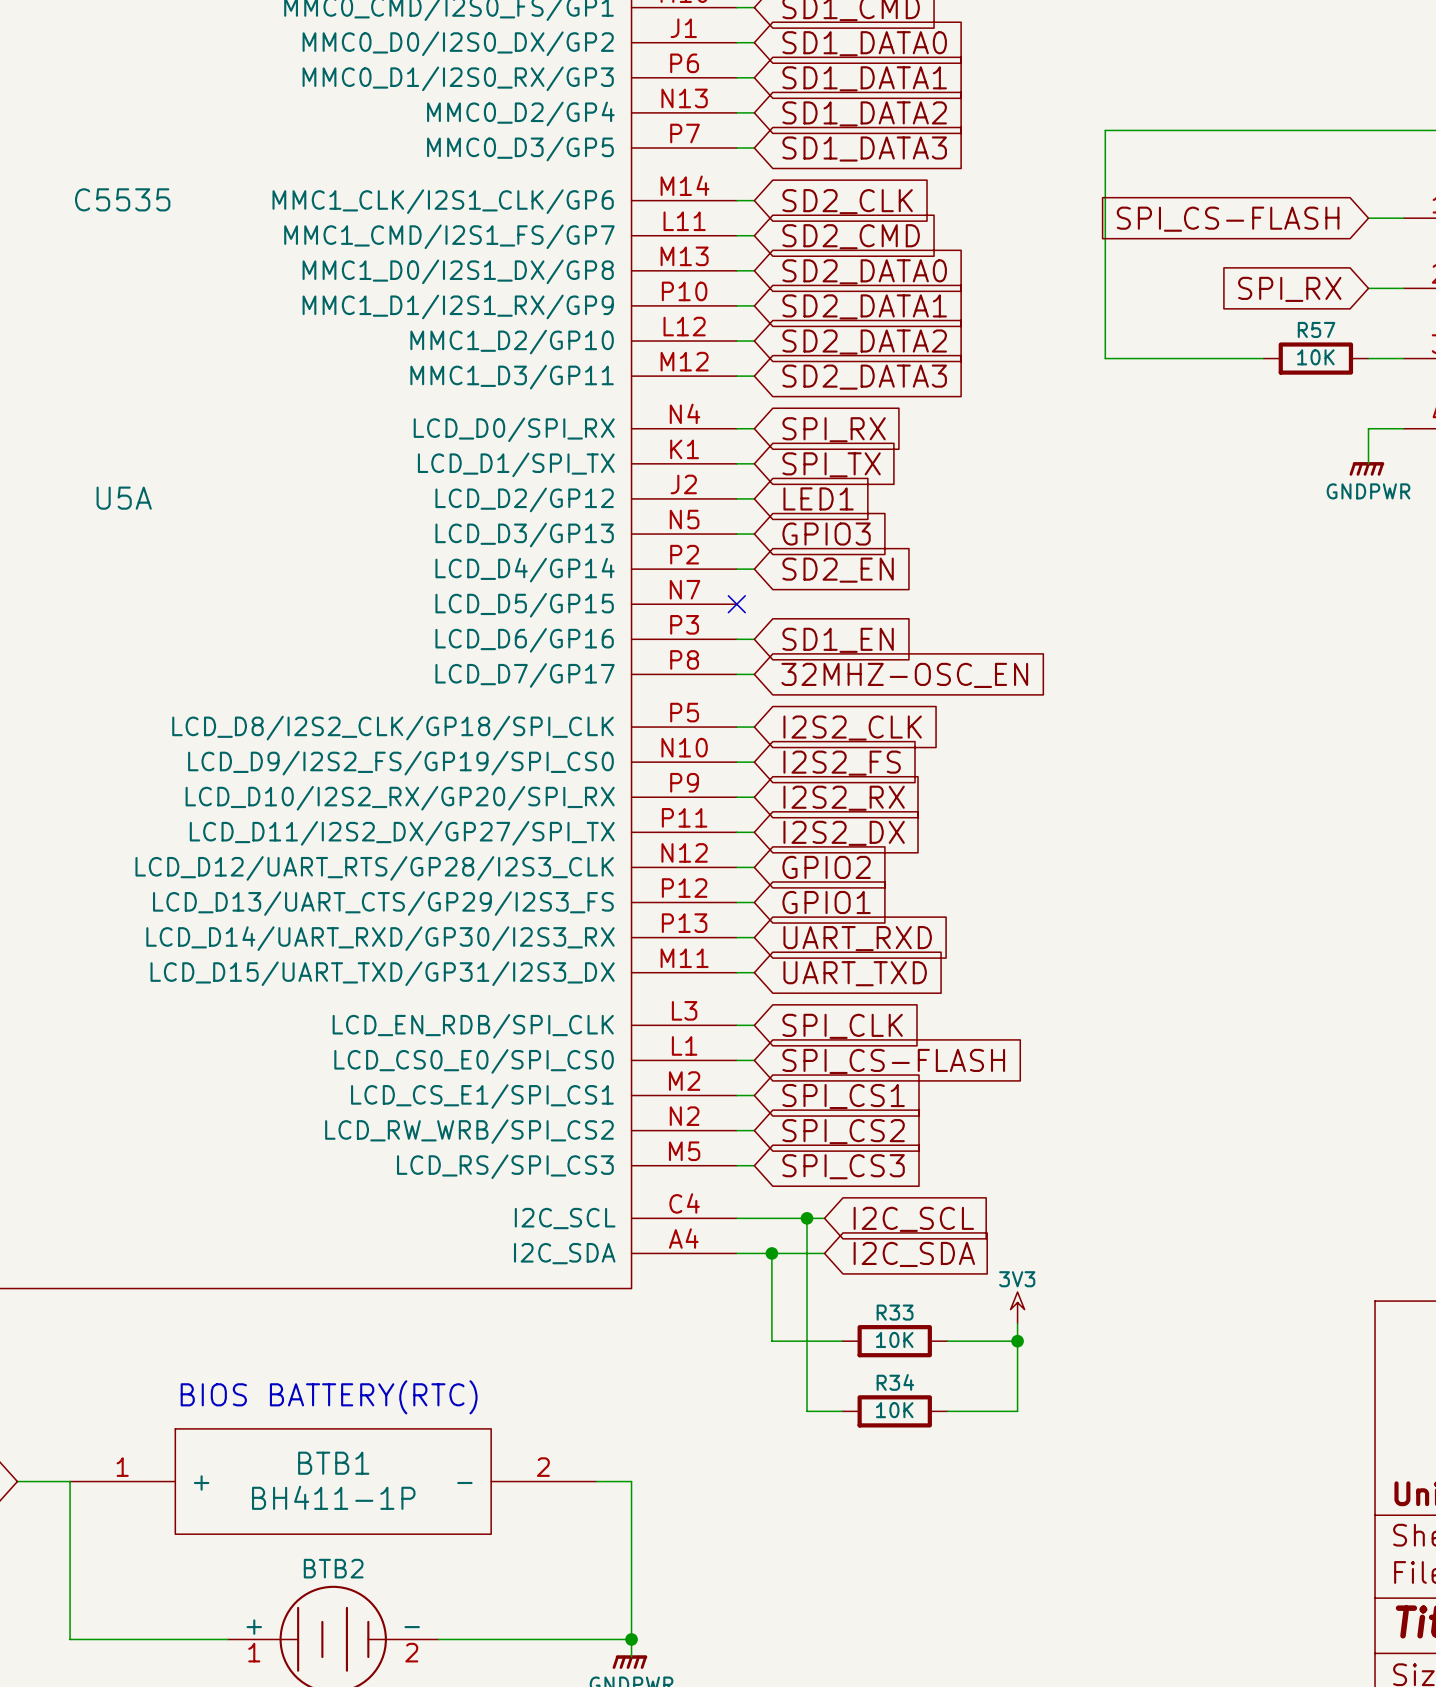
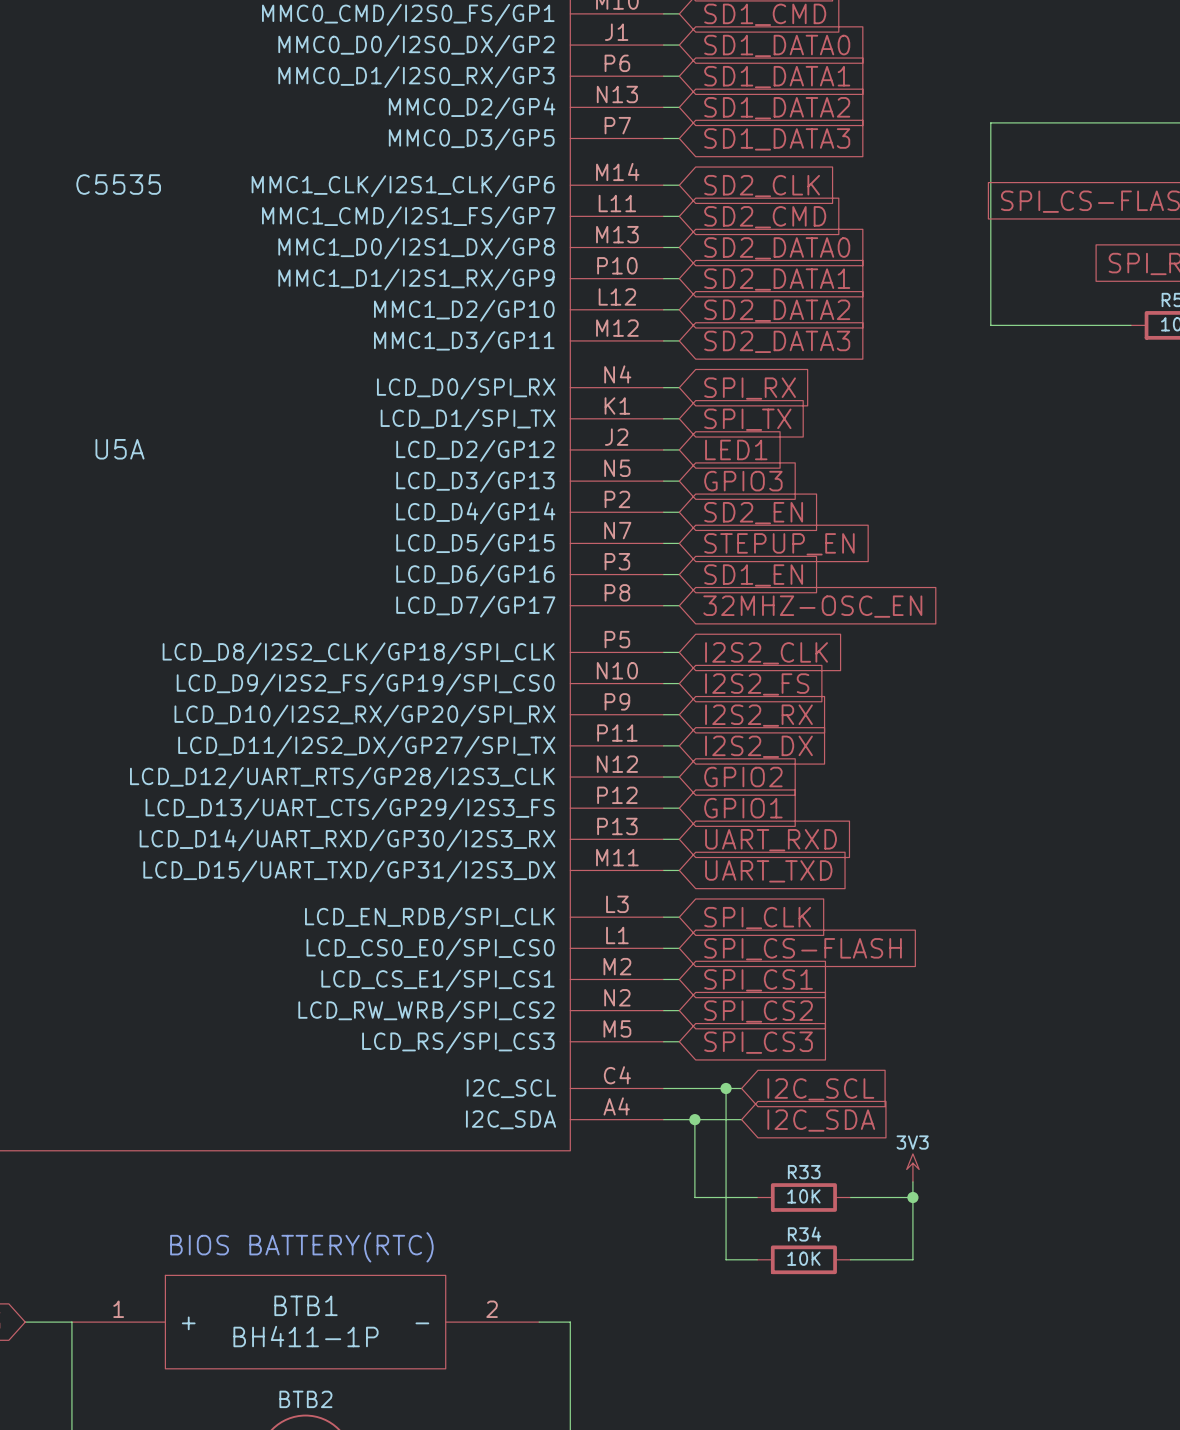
wire: none -> (663, 543) (679, 543)
no-connect mark: (736, 604) -> none
global label: none -> STEPUP_EN (779, 544)

